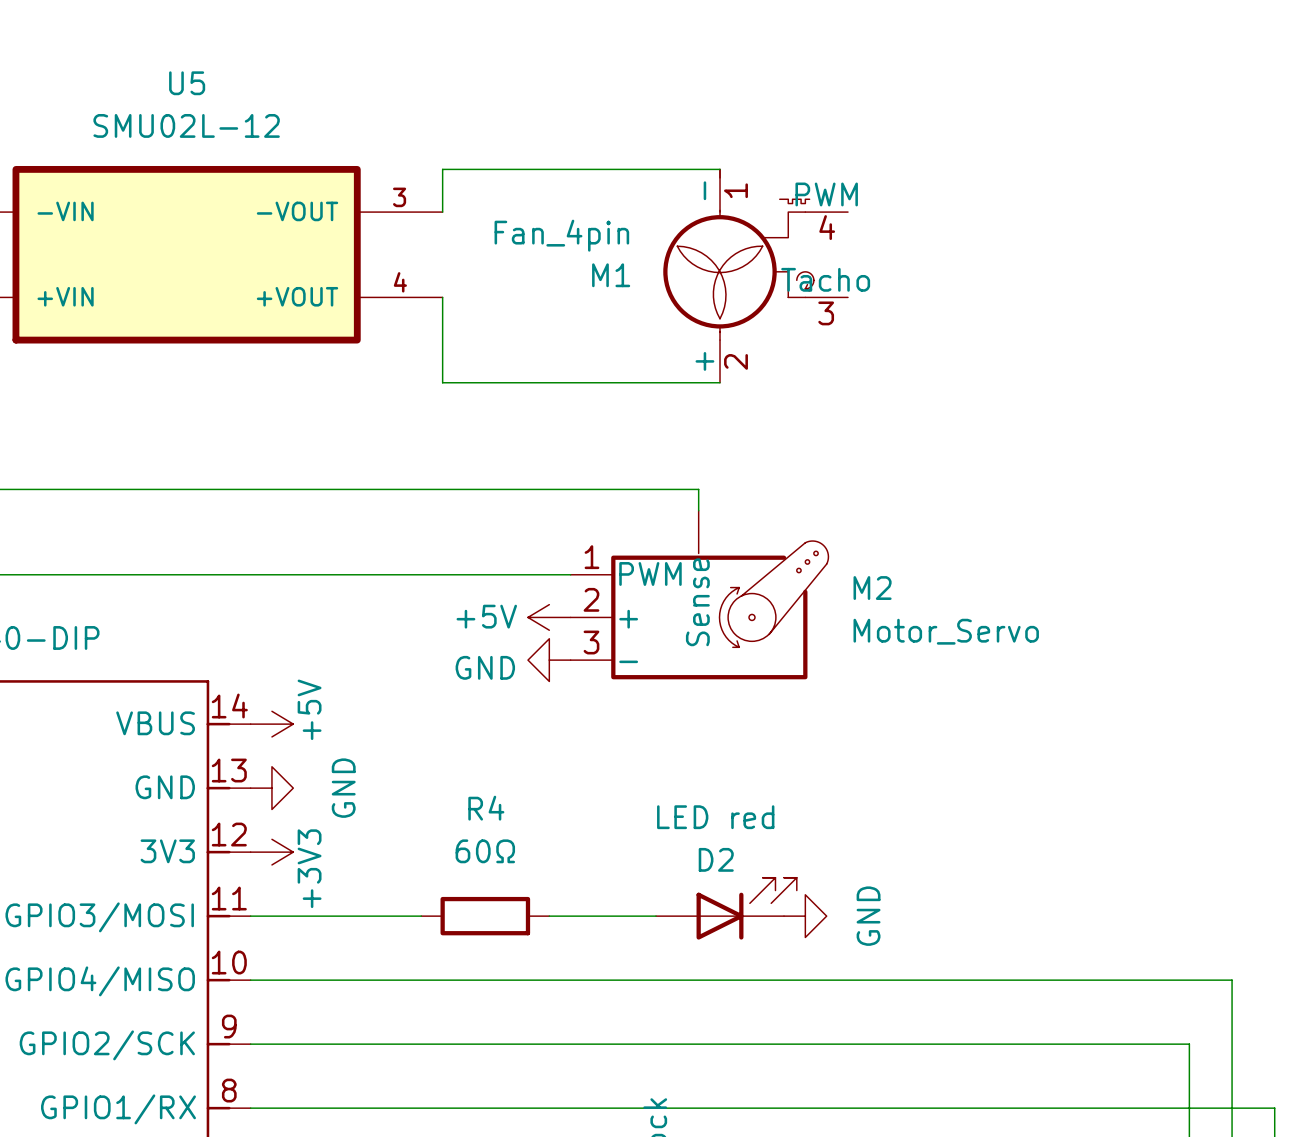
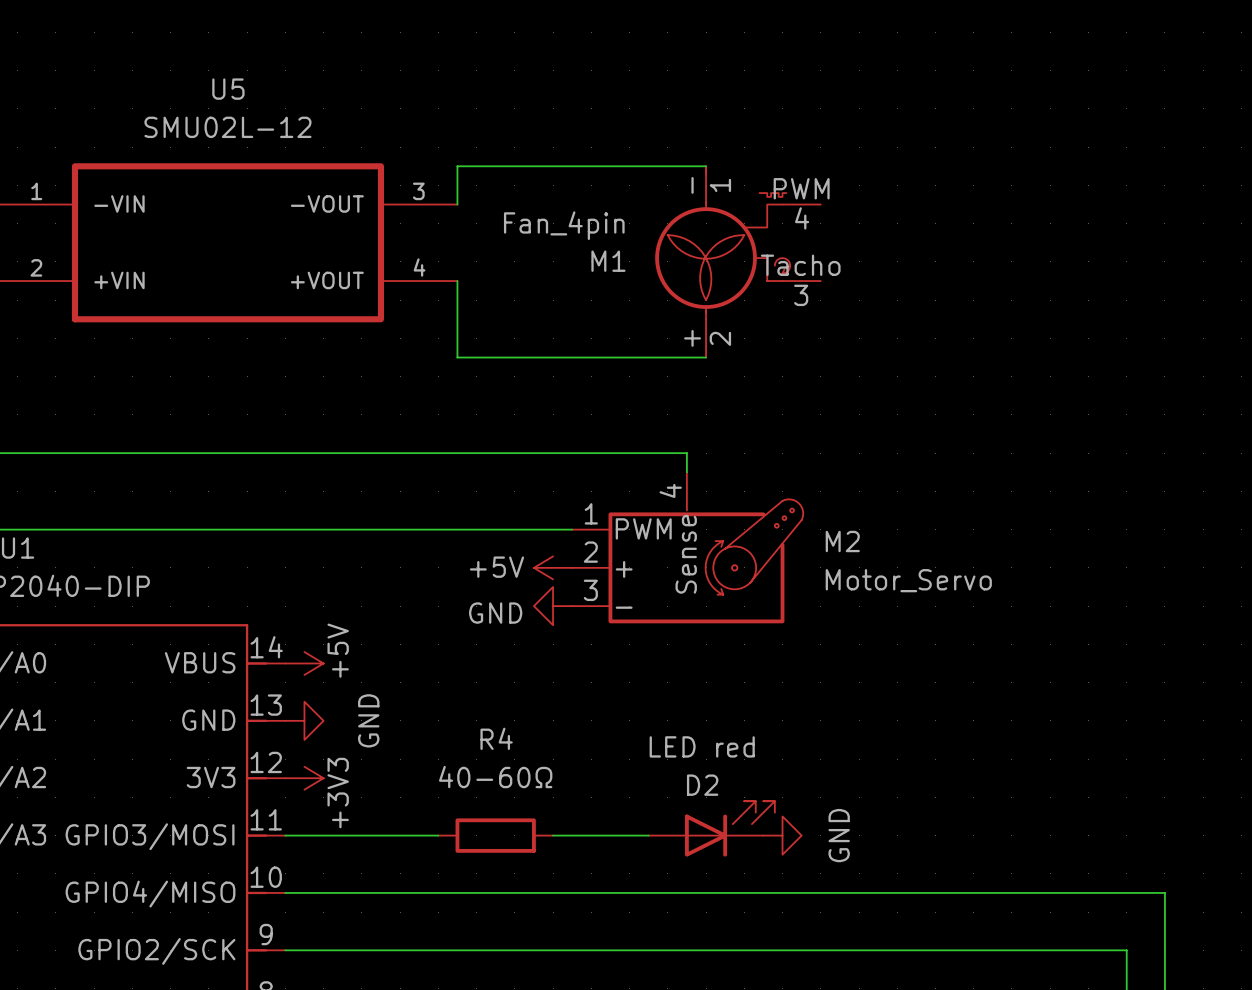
M2 pin number: none -> 4 (670, 490)
R4 value: 60Ω (485, 851) -> 40-60Ω (495, 777)

